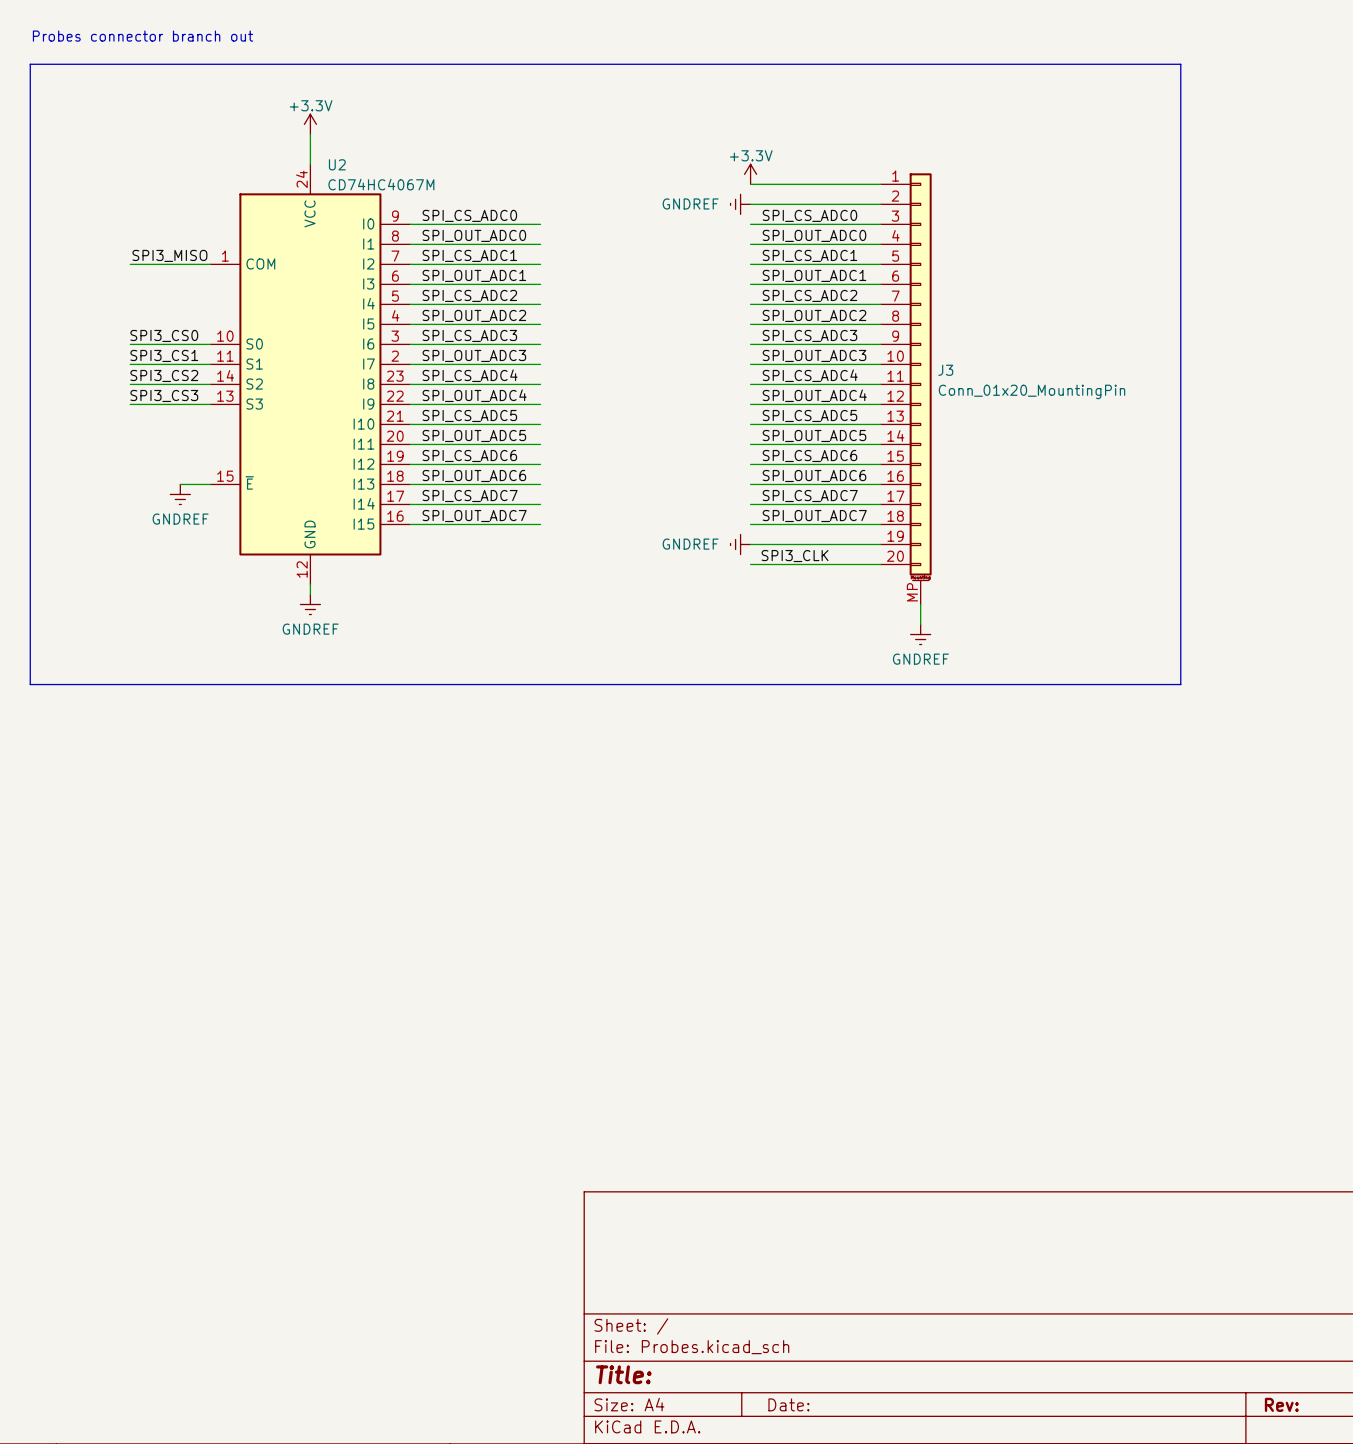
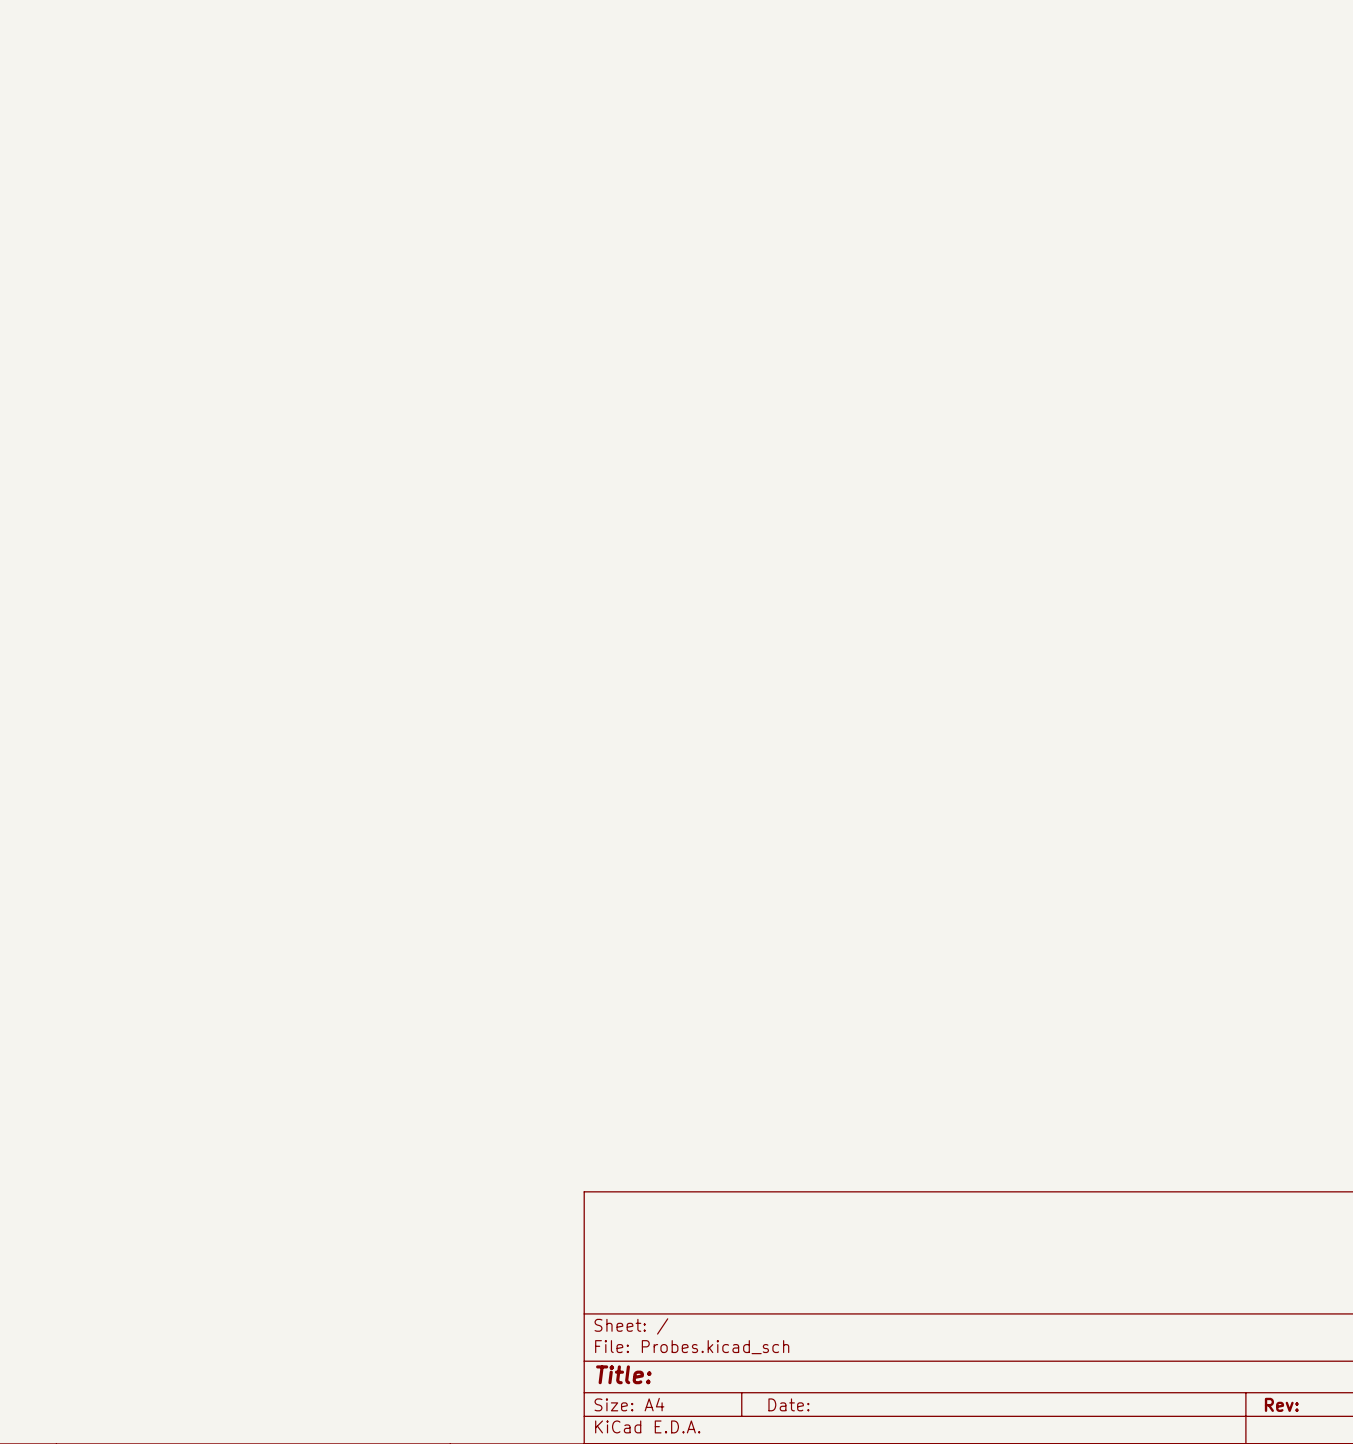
text: Probes connector branch out (143, 36) -> none
line: (30, 64) (30, 684) (1180, 684) (1180, 64) (30, 64) -> none
power symbol: +3.3V (310, 124) -> none
wire: (310, 134) (310, 164) -> none
power symbol: +3.3V (750, 174) -> none
wire: (750, 184) (880, 184) -> none
power symbol: GNDREF (740, 204) -> none
wire: (750, 204) (880, 204) -> none
label: SPI_CS_ADC0 (469, 215) -> none
label: SPI_CS_ADC0 (809, 215) -> none
wire: (410, 224) (540, 224) -> none
wire: (750, 224) (880, 224) -> none
label: SPI_OUT_ADC0 (474, 235) -> none
label: SPI_OUT_ADC0 (814, 235) -> none
wire: (410, 244) (540, 244) -> none
wire: (750, 244) (880, 244) -> none
label: SPI3_MISO (169, 255) -> none
label: SPI_CS_ADC1 (469, 255) -> none
label: SPI_CS_ADC1 (809, 255) -> none
wire: (130, 264) (210, 264) -> none
wire: (410, 264) (540, 264) -> none
wire: (750, 264) (880, 264) -> none
label: SPI_OUT_ADC1 (474, 275) -> none
label: SPI_OUT_ADC1 (814, 275) -> none
wire: (410, 284) (540, 284) -> none
wire: (750, 284) (880, 284) -> none
label: SPI_CS_ADC2 (469, 295) -> none
label: SPI_CS_ADC2 (809, 295) -> none
wire: (410, 304) (540, 304) -> none
wire: (750, 304) (880, 304) -> none
label: SPI_OUT_ADC2 (474, 315) -> none
label: SPI_OUT_ADC2 (814, 315) -> none
wire: (410, 324) (540, 324) -> none
wire: (750, 324) (880, 324) -> none
label: SPI3_CS0 (164, 335) -> none
label: SPI_CS_ADC3 (469, 335) -> none
label: SPI_CS_ADC3 (809, 335) -> none
wire: (130, 344) (210, 344) -> none
wire: (410, 344) (540, 344) -> none
wire: (750, 344) (880, 344) -> none
label: SPI3_CS1 (164, 355) -> none
label: SPI_OUT_ADC3 (474, 355) -> none
label: SPI_OUT_ADC3 (814, 355) -> none
wire: (130, 364) (210, 364) -> none
wire: (410, 364) (540, 364) -> none
wire: (750, 364) (880, 364) -> none
U2: CD74HC4067M (310, 374) -> none
label: SPI3_CS2 (164, 375) -> none
label: SPI_CS_ADC4 (470, 375) -> none
label: SPI_CS_ADC4 (810, 375) -> none
wire: (130, 384) (210, 384) -> none
wire: (410, 384) (540, 384) -> none
wire: (750, 384) (880, 384) -> none
J3: Conn_01x20_MountingPin (906, 388) -> none
label: SPI3_CS3 (164, 395) -> none
label: SPI_OUT_ADC4 (474, 395) -> none
label: SPI_OUT_ADC4 (814, 395) -> none
wire: (130, 404) (210, 404) -> none
wire: (410, 404) (540, 404) -> none
wire: (750, 404) (880, 404) -> none
label: SPI_CS_ADC5 (469, 415) -> none
label: SPI_CS_ADC5 (809, 415) -> none
wire: (410, 424) (540, 424) -> none
wire: (750, 424) (880, 424) -> none
label: SPI_OUT_ADC5 (474, 435) -> none
label: SPI_OUT_ADC5 (814, 435) -> none
wire: (410, 444) (540, 444) -> none
wire: (750, 444) (880, 444) -> none
label: SPI_CS_ADC6 (469, 456) -> none
label: SPI_CS_ADC6 (809, 456) -> none
wire: (410, 464) (540, 464) -> none
wire: (750, 464) (880, 464) -> none
label: SPI_OUT_ADC6 (474, 476) -> none
label: SPI_OUT_ADC6 (814, 476) -> none
wire: (180, 484) (210, 484) -> none
wire: (410, 484) (540, 484) -> none
wire: (750, 484) (880, 484) -> none
power symbol: GNDREF (180, 494) -> none
label: SPI_CS_ADC7 (470, 496) -> none
label: SPI_CS_ADC7 (810, 496) -> none
wire: (410, 504) (540, 504) -> none
wire: (750, 504) (880, 504) -> none
label: SPI_OUT_ADC7 (474, 516) -> none
label: SPI_OUT_ADC7 (814, 516) -> none
wire: (410, 524) (540, 524) -> none
wire: (750, 524) (880, 524) -> none
power symbol: GNDREF (740, 544) -> none
wire: (750, 544) (880, 544) -> none
label: SPI3_CLK (795, 556) -> none
wire: (750, 564) (880, 564) -> none
wire: (310, 584) (310, 594) -> none
power symbol: GNDREF (310, 604) -> none
wire: (920, 604) (920, 624) -> none
power symbol: GNDREF (920, 634) -> none

